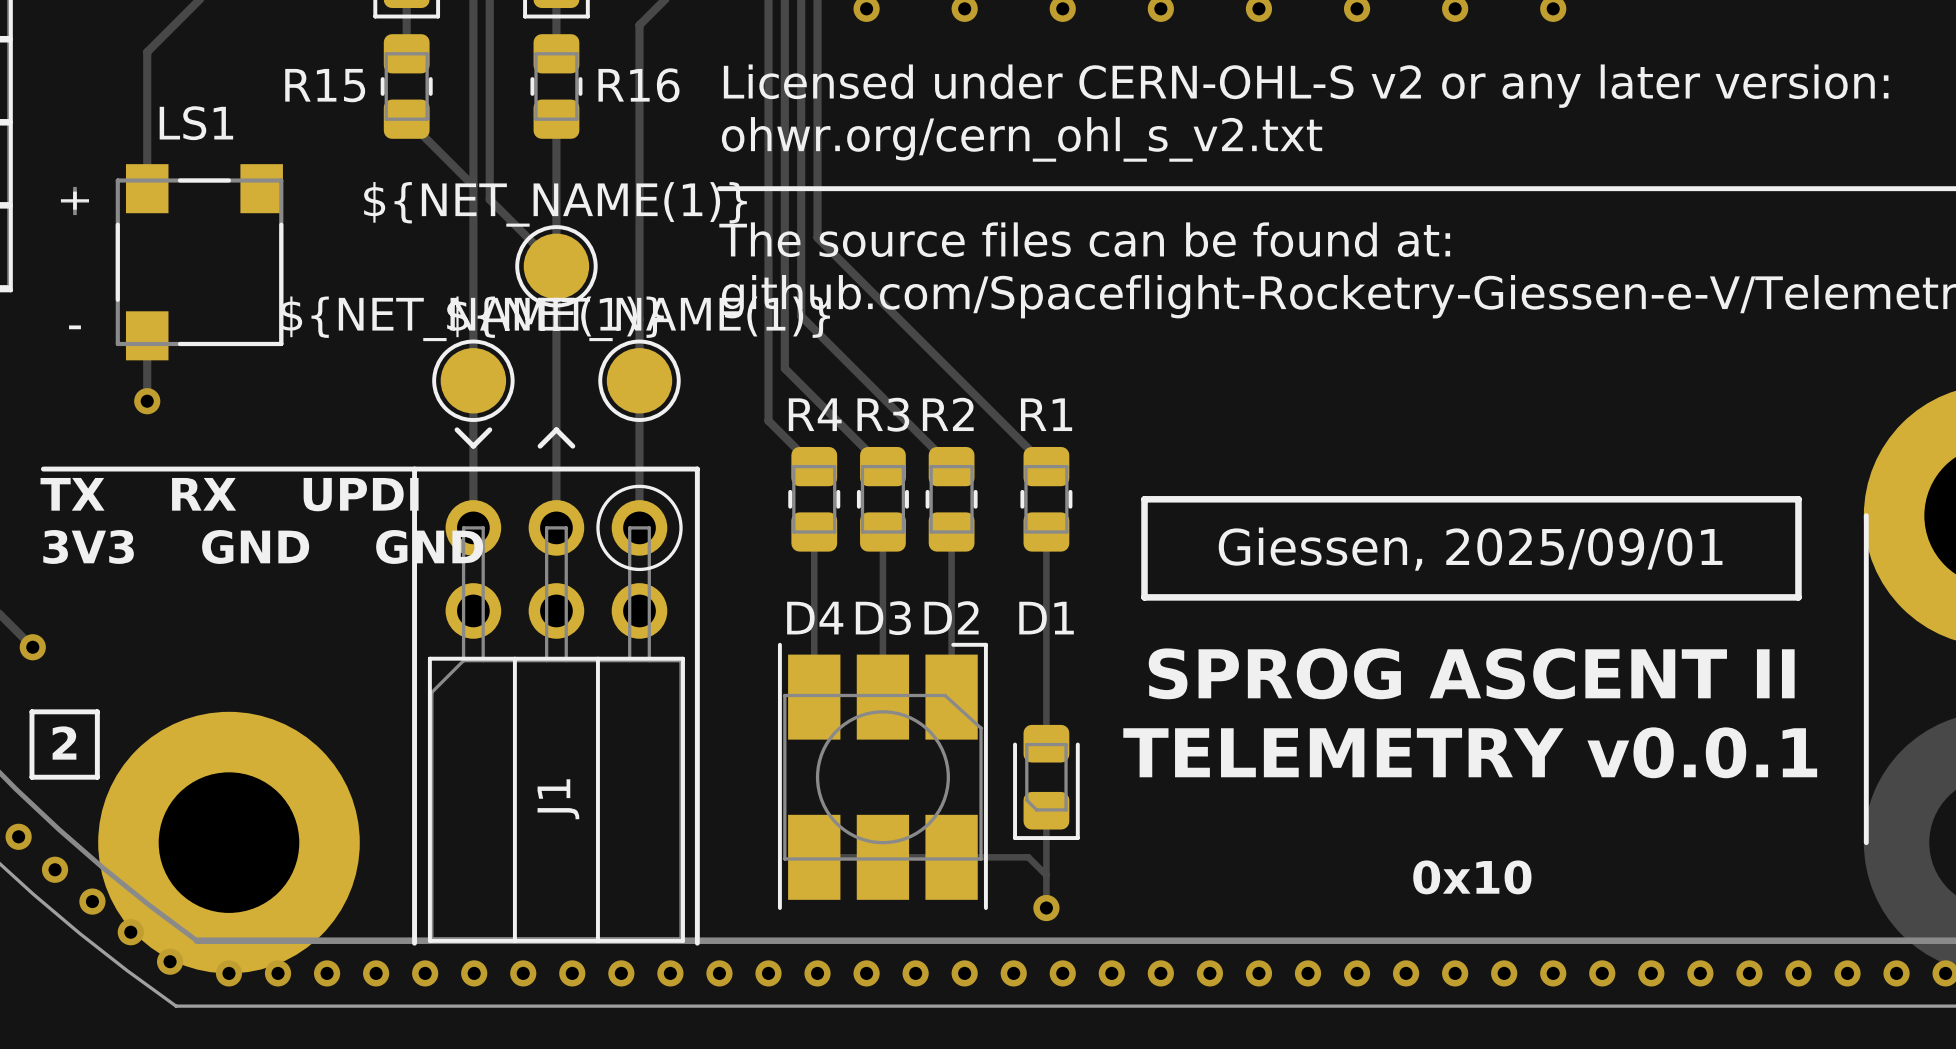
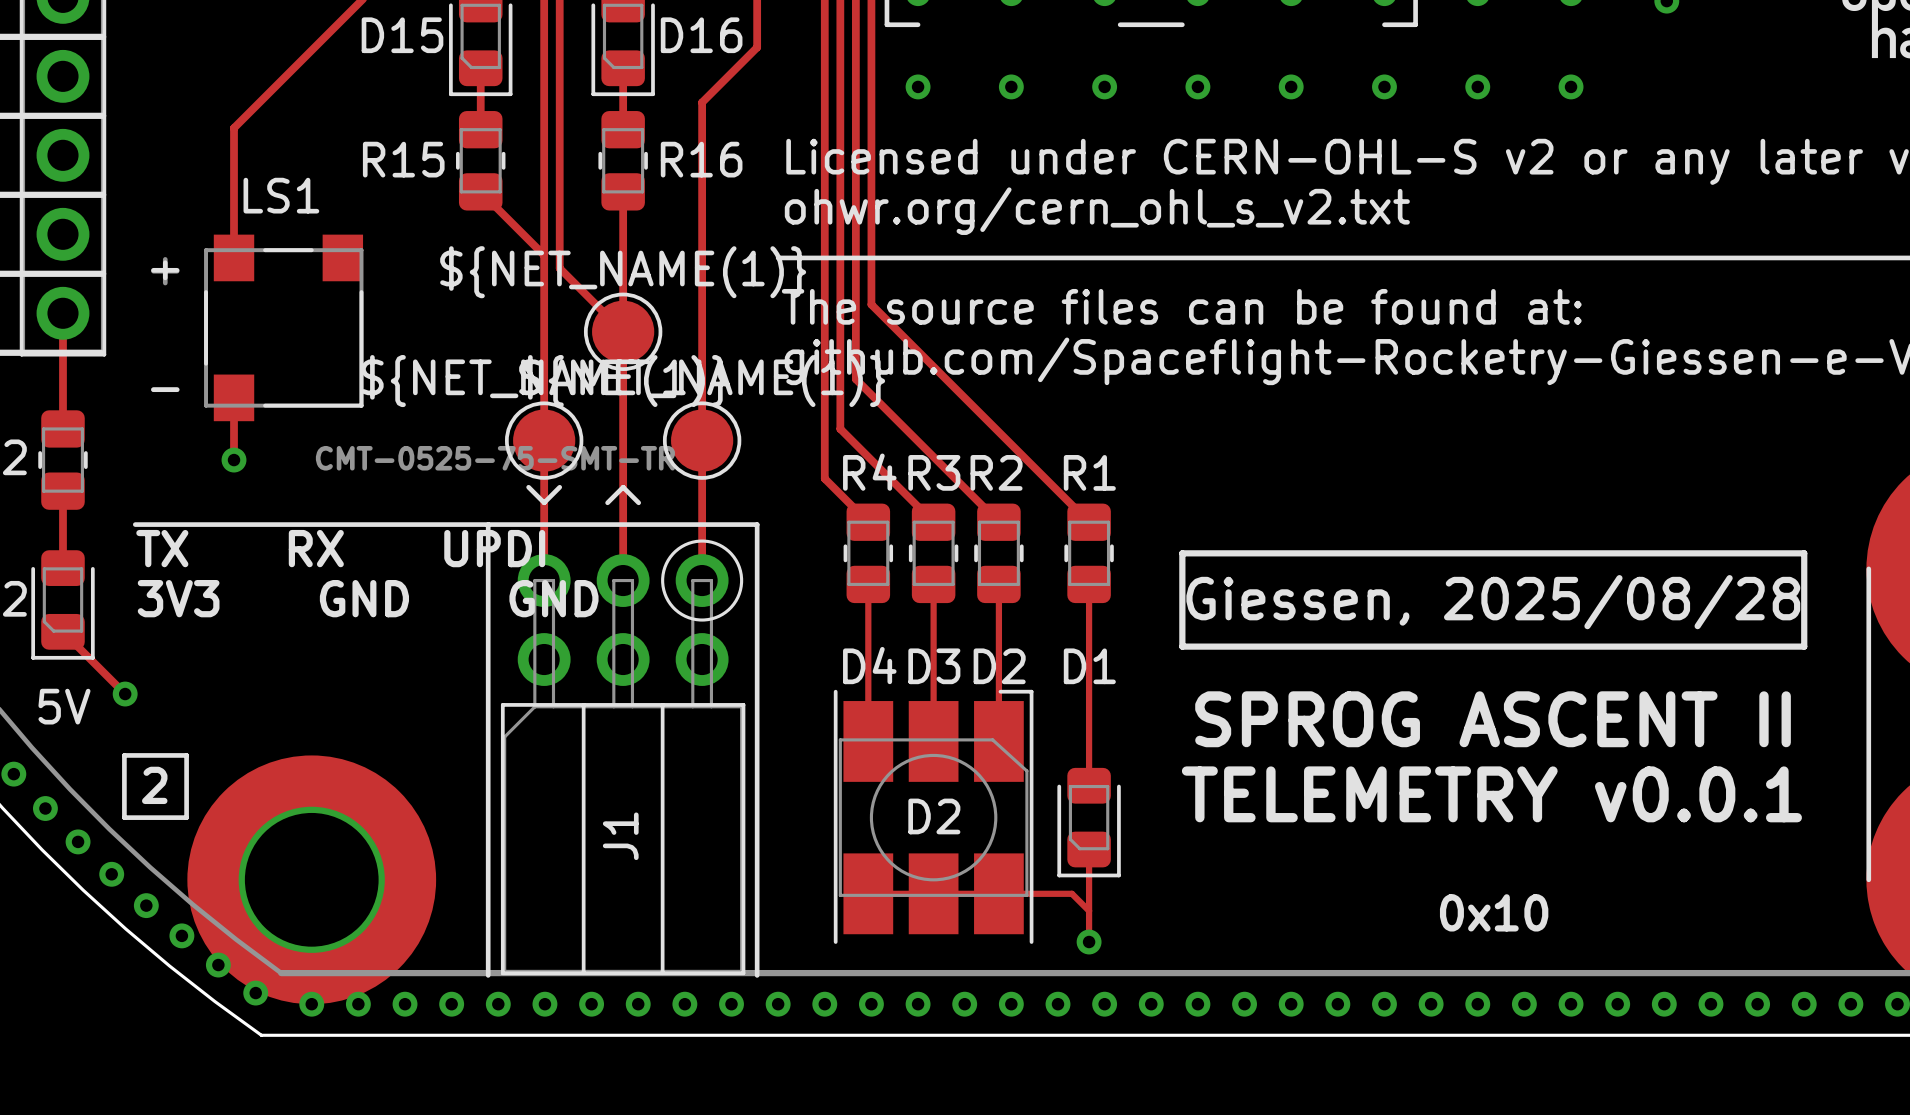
LS1 value: none -> CMT-0525-75-SMT-TR (495, 458)
text: Giessen, 2025/09/01 (1470, 549) -> Giessen, 2025/08/28 (1493, 602)
D2 name: none -> D2 (934, 816)

